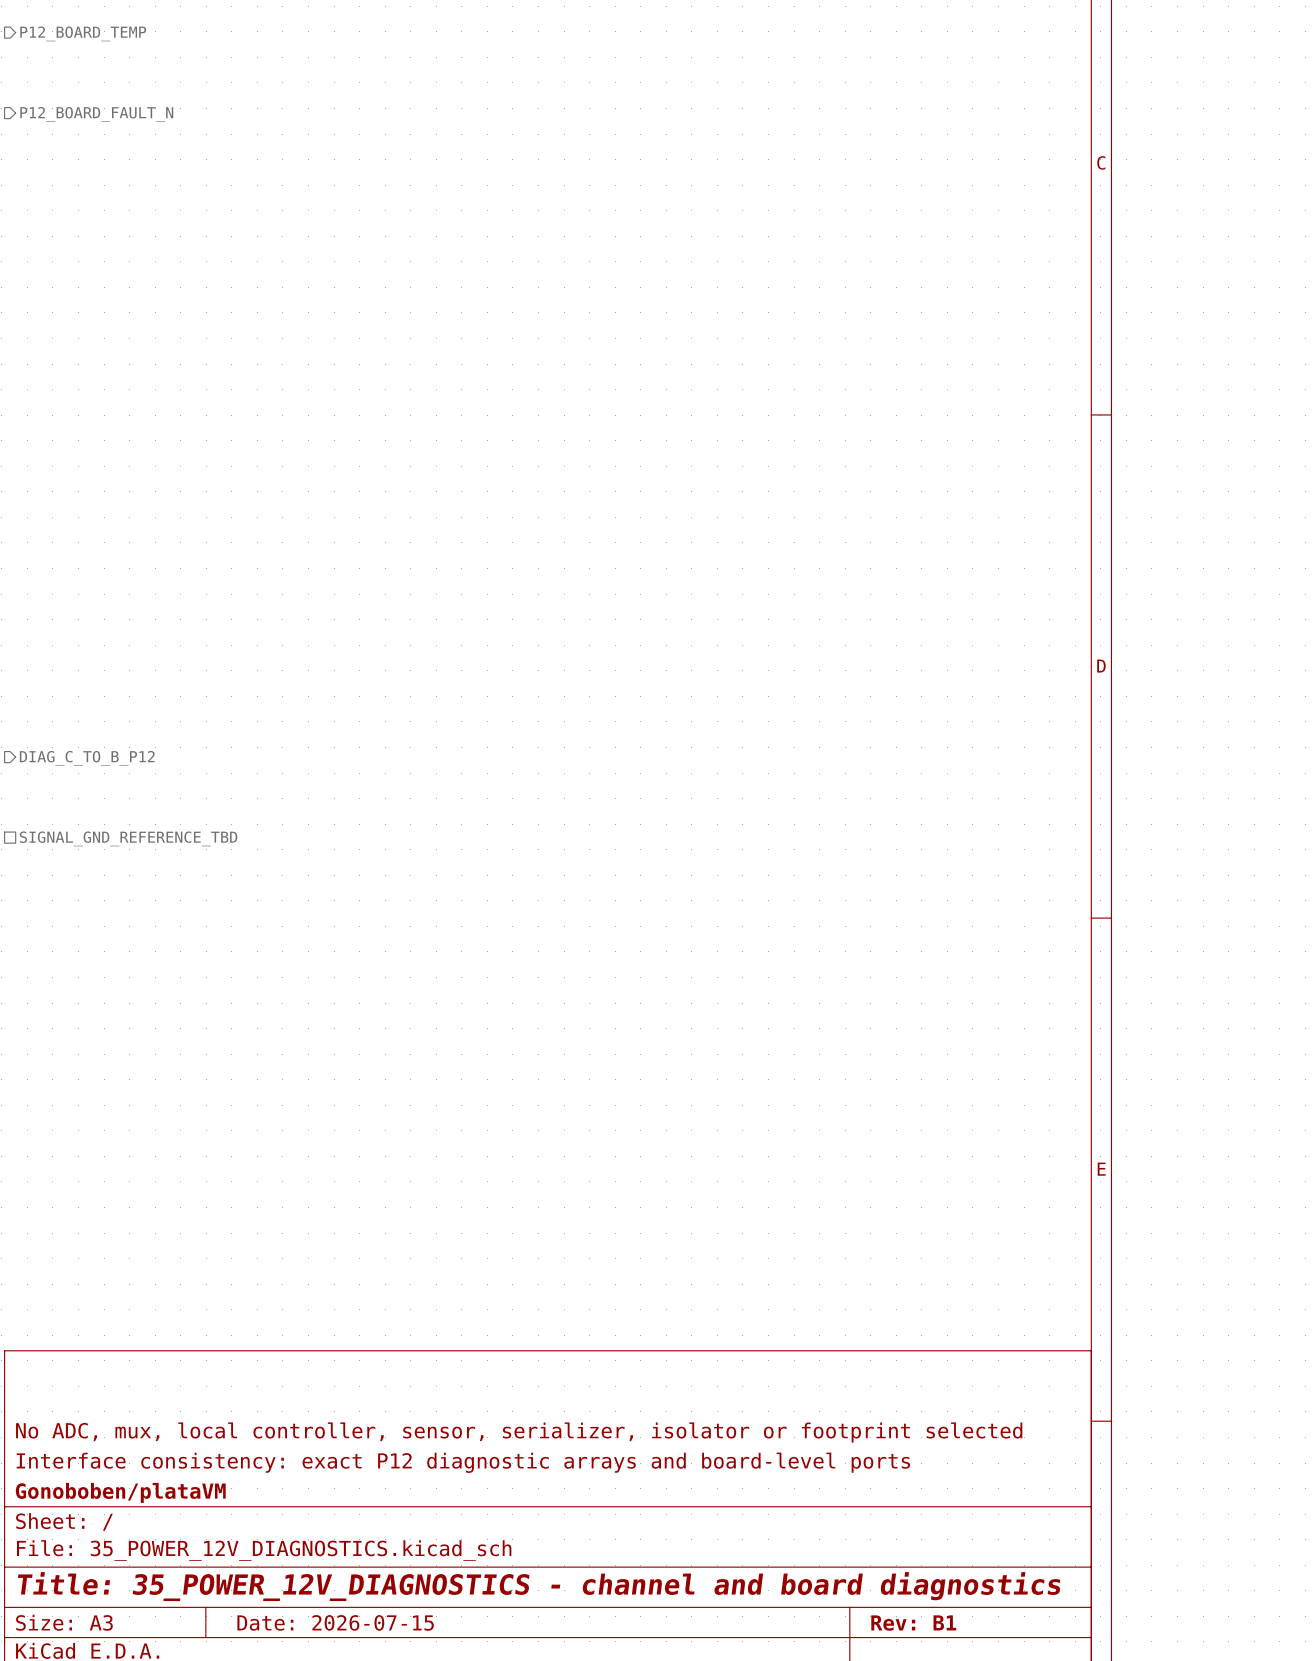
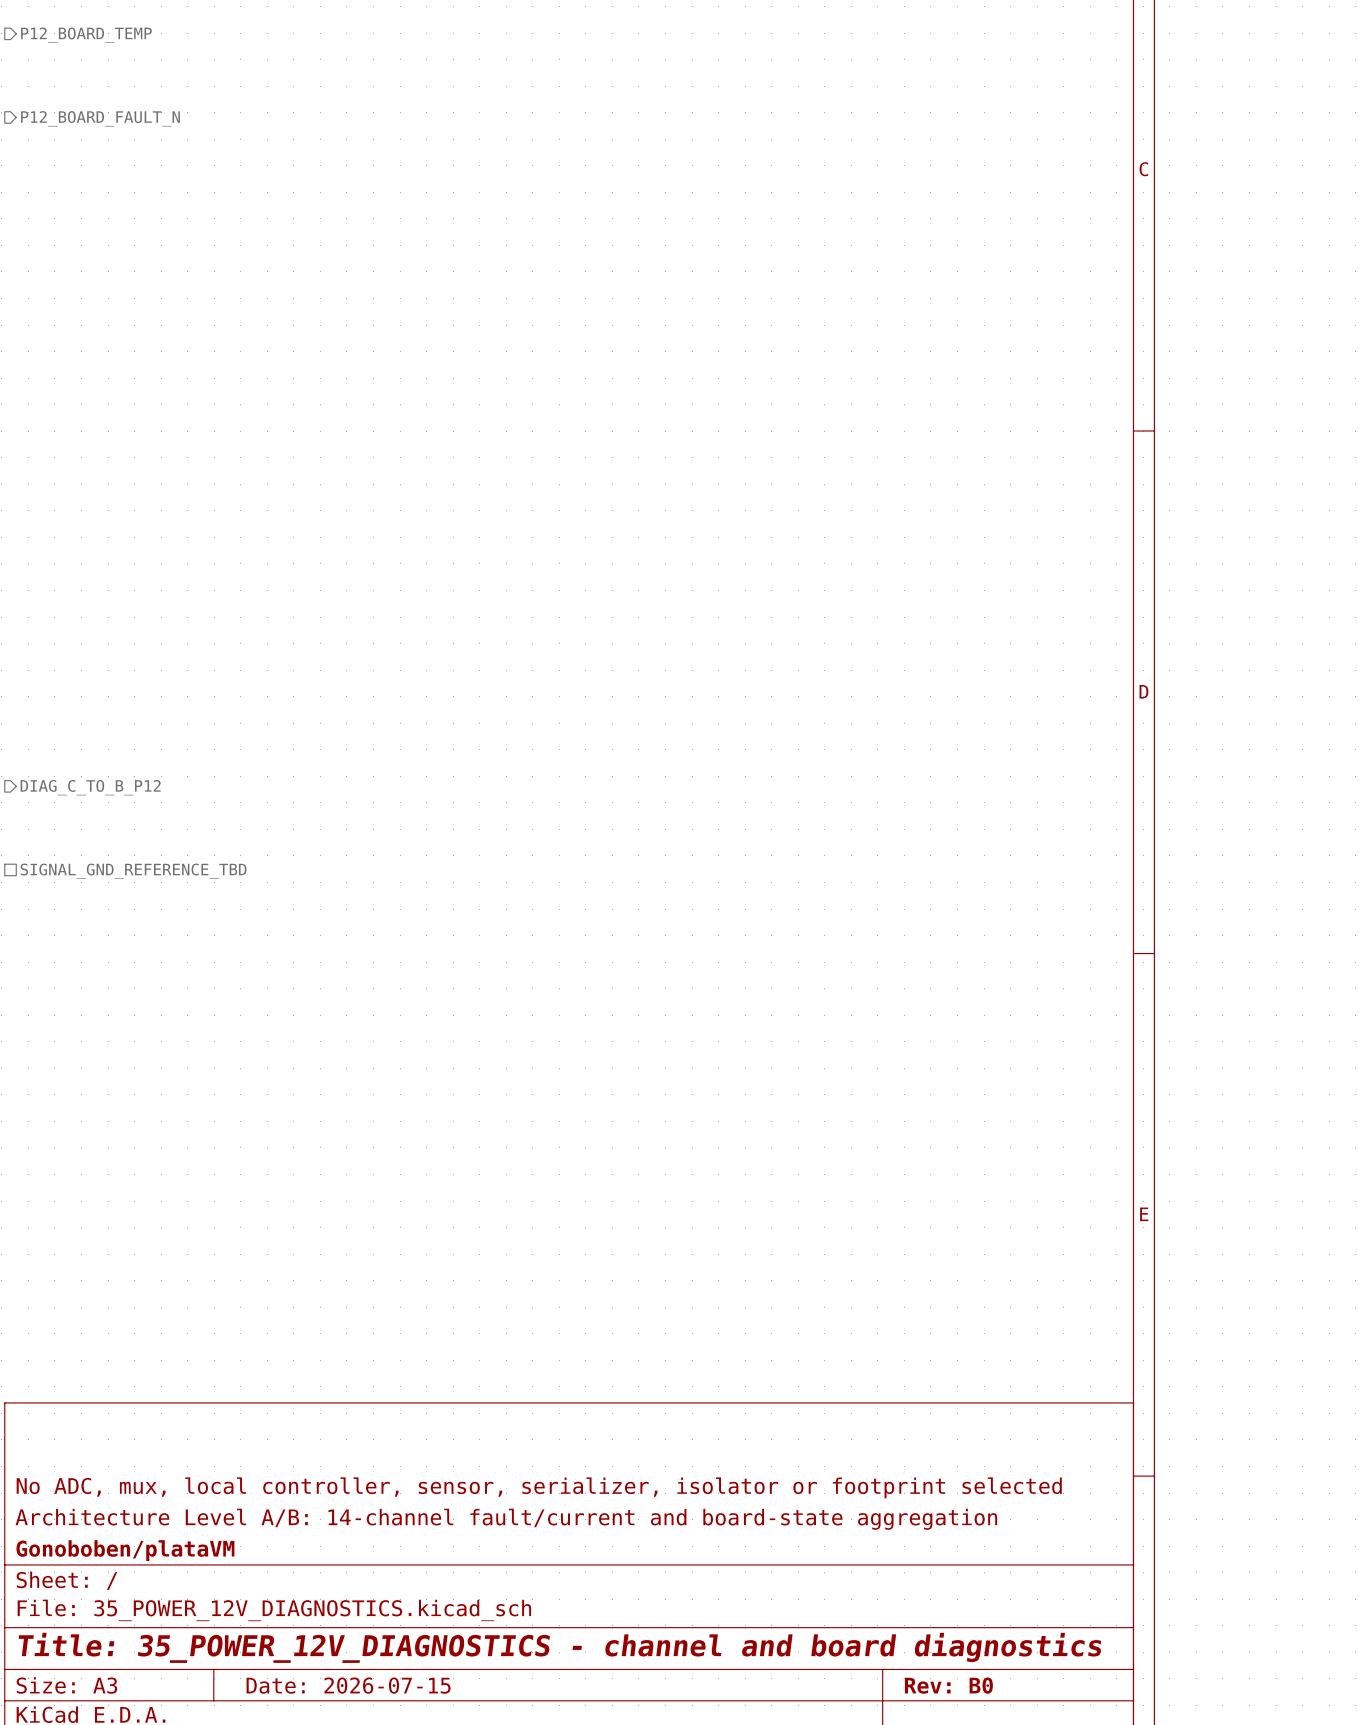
title block: Interface consistency: exact P12 diagnostic arrays and board-level ports (463, 1462) -> Architecture Level A/B: 14-channel fault/current and board-state aggregation (506, 1519)
title block: Rev: B1 (913, 1623) -> Rev: B0 (948, 1685)

